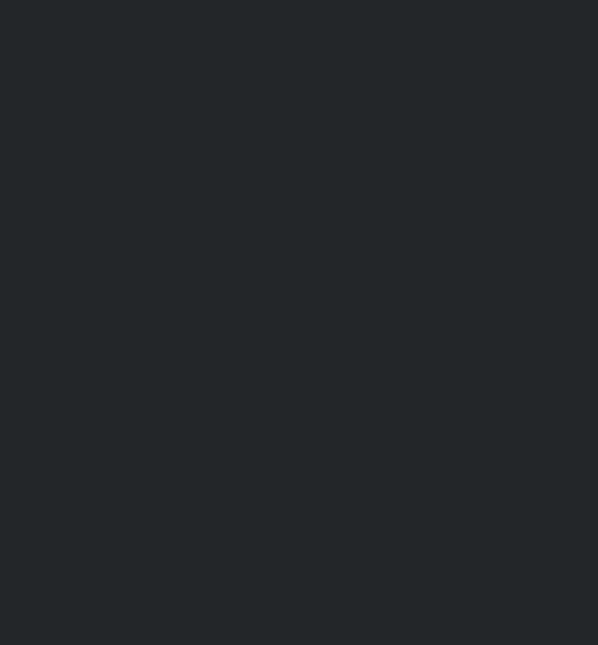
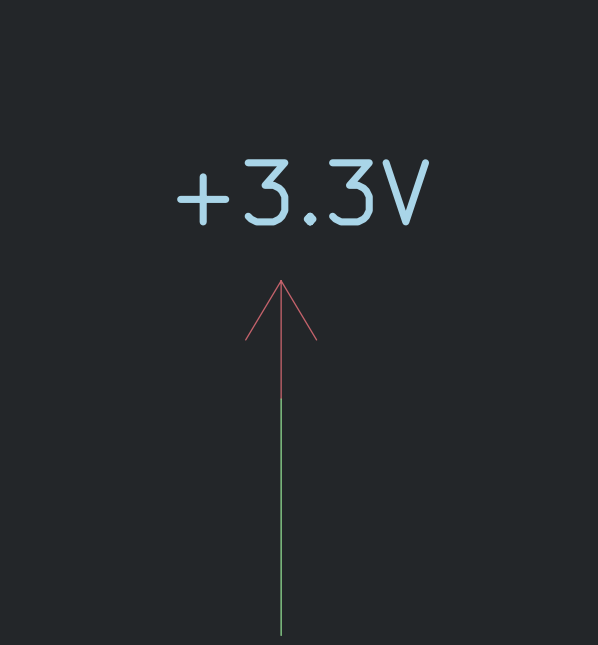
power symbol: none -> +3.3V (281, 339)
wire: none -> (281, 399) (281, 635)

